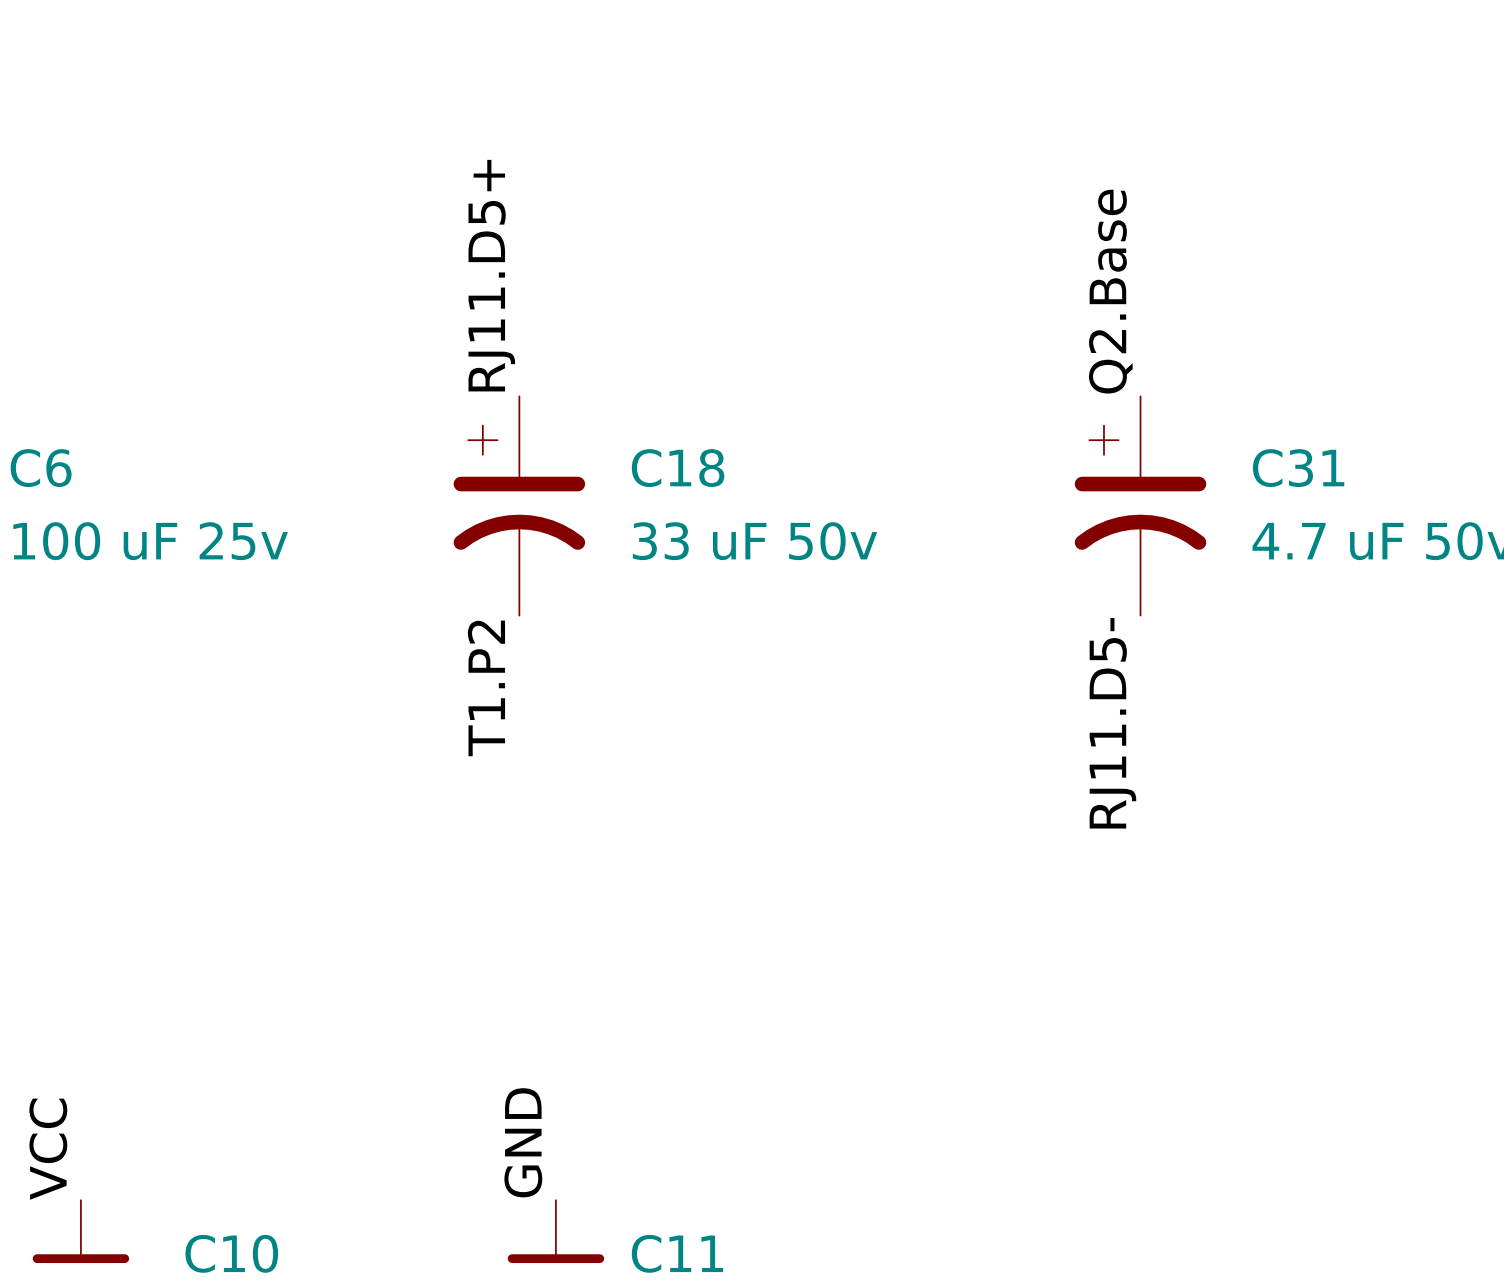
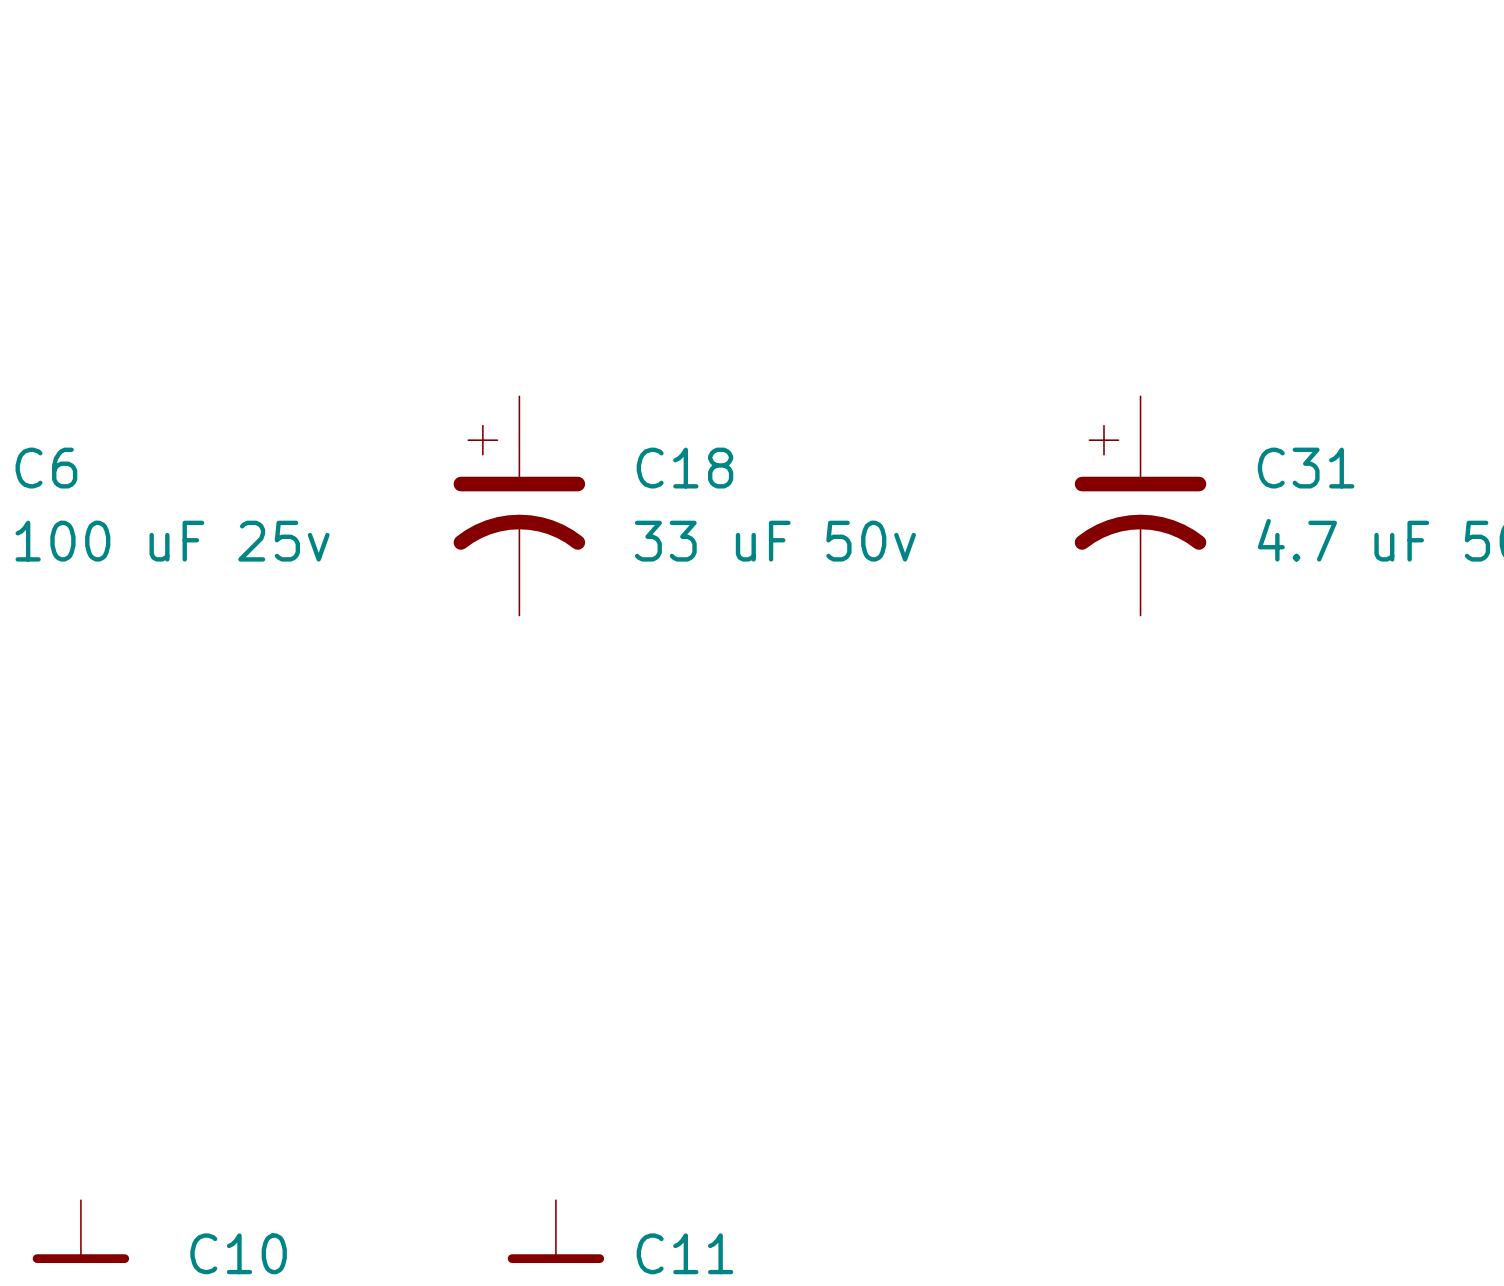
label: RJ11.D5+ (491, 275) -> none
label: Q2.Base (1110, 291) -> none
label: T1.P2 (486, 688) -> none
label: RJ11.D5- (1112, 723) -> none
label: GND (523, 1142) -> none
label: VCC (48, 1149) -> none

